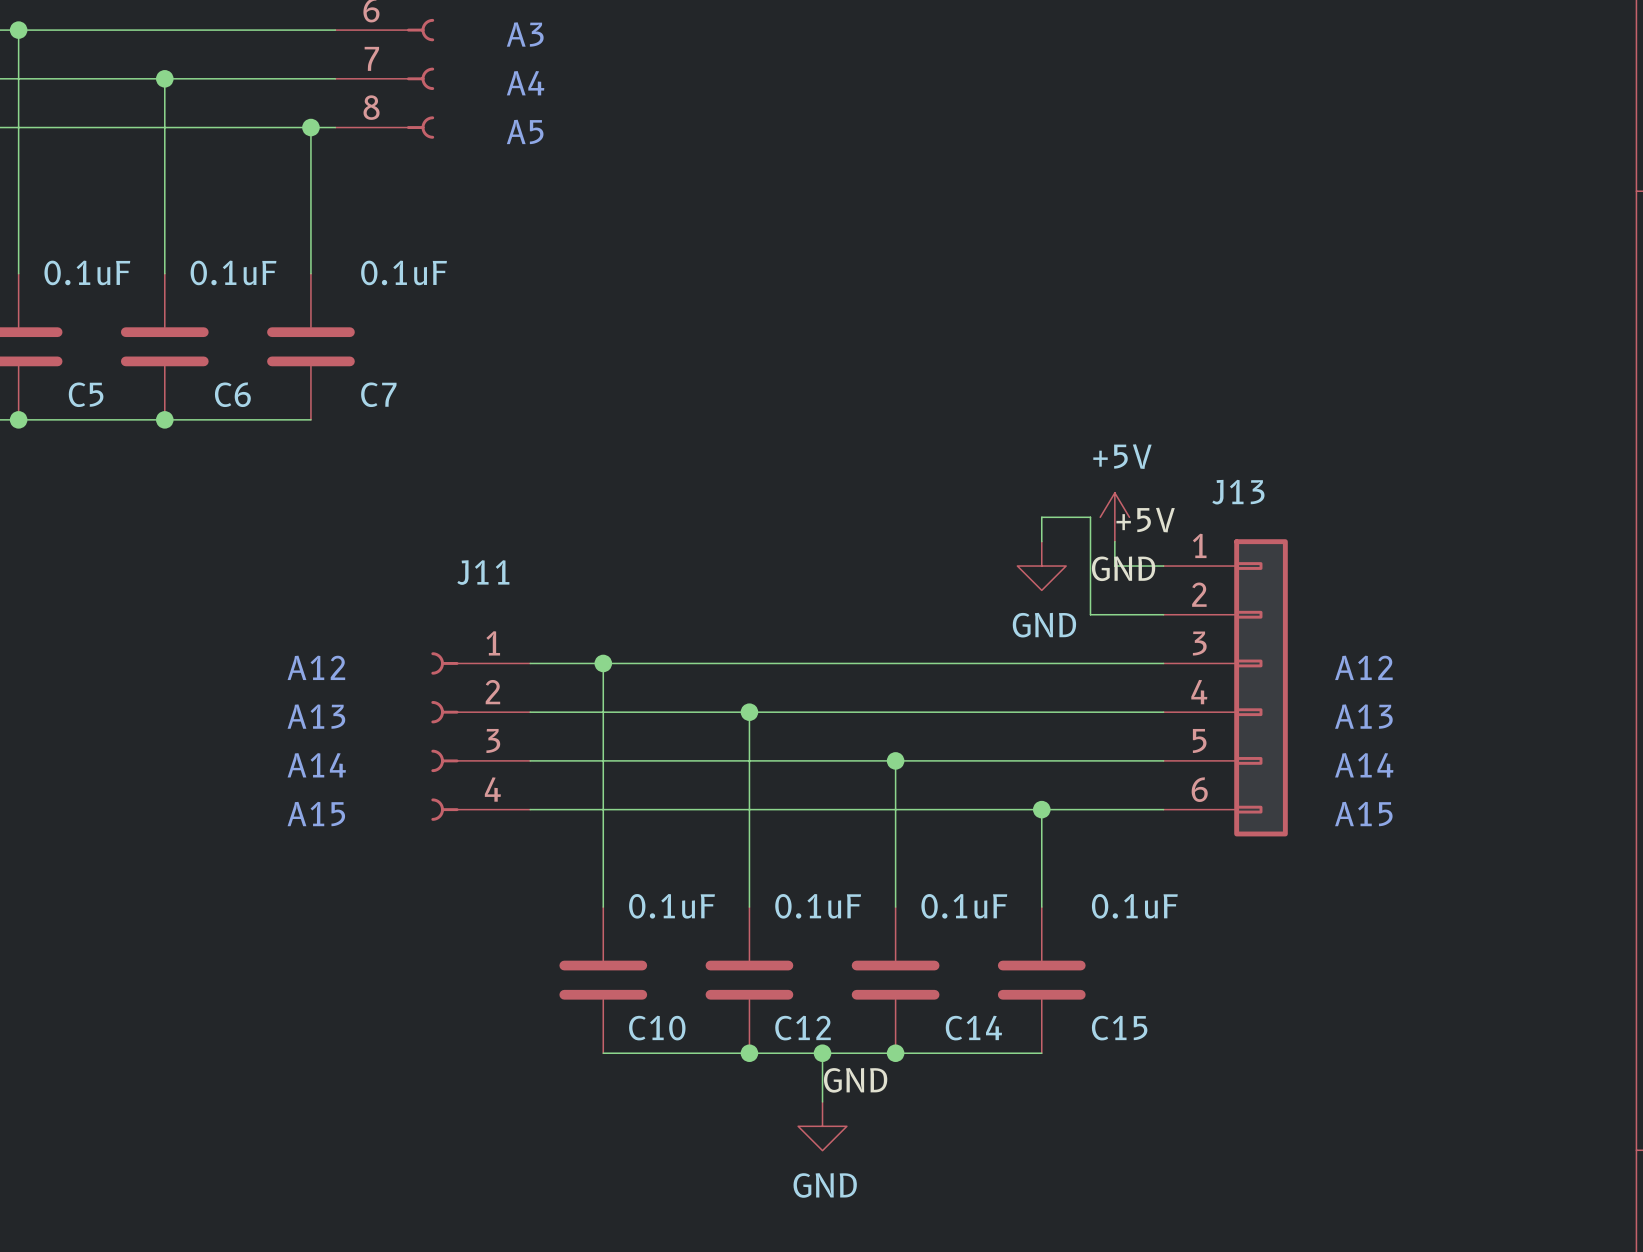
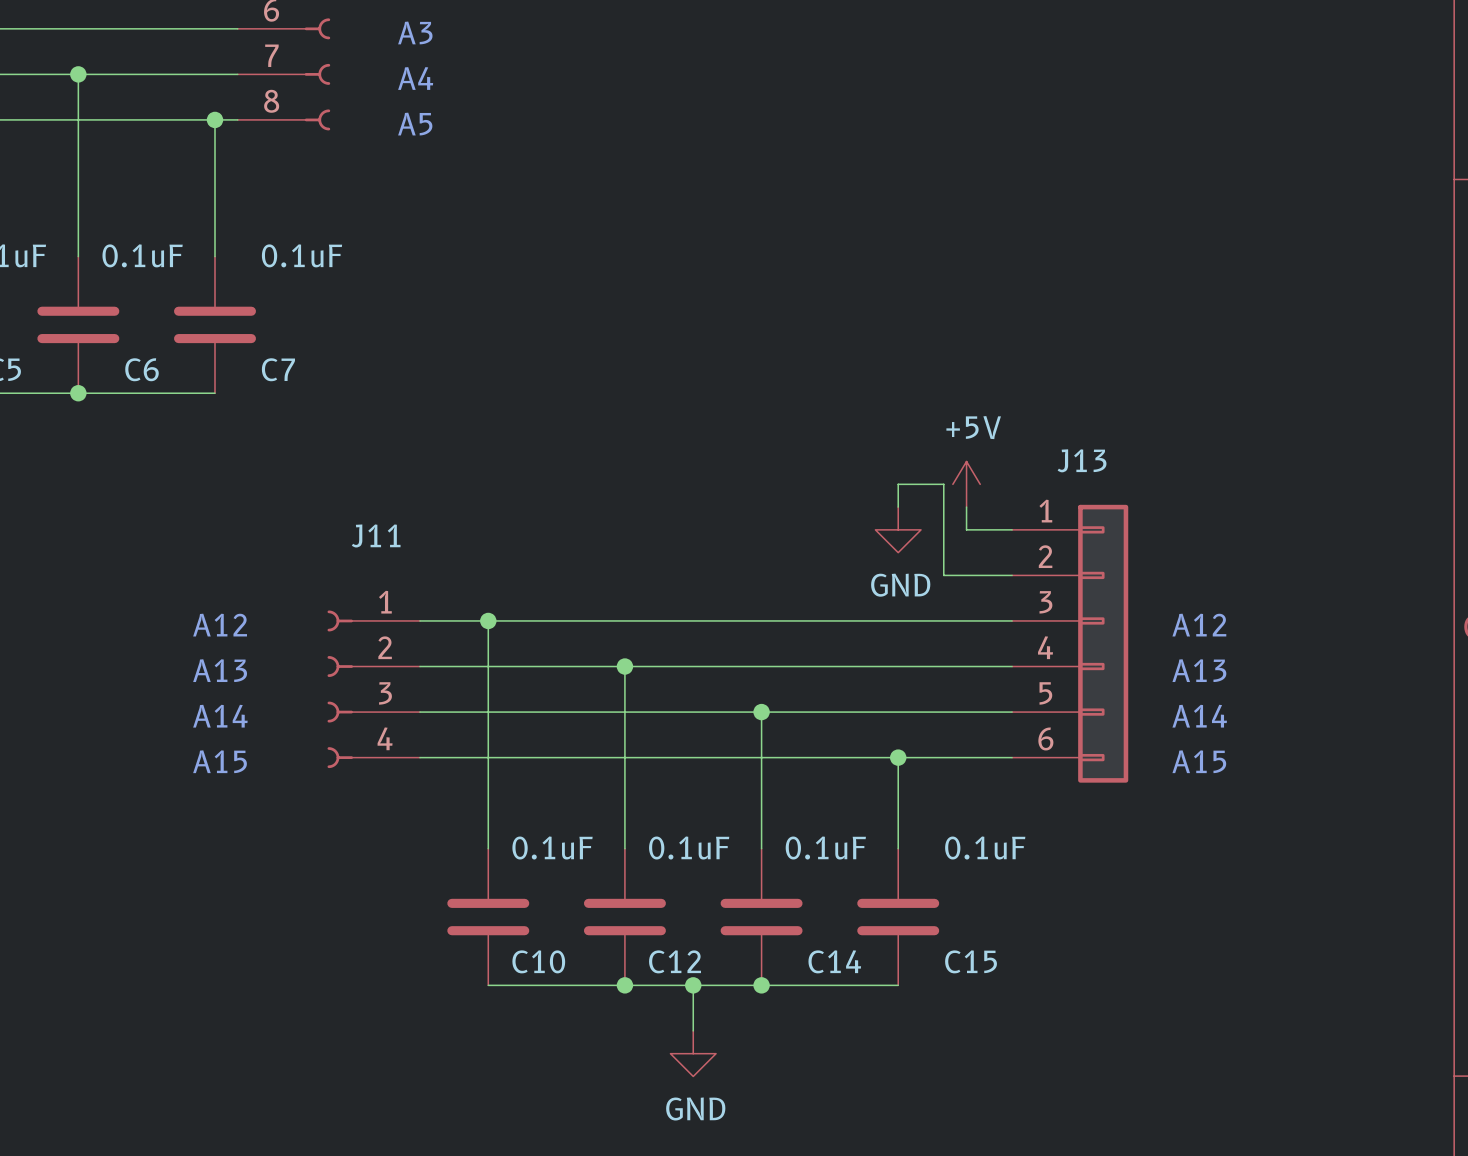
label: +5V (1145, 520) -> none
label: GND (1123, 568) -> none
label: GND (855, 1080) -> none

